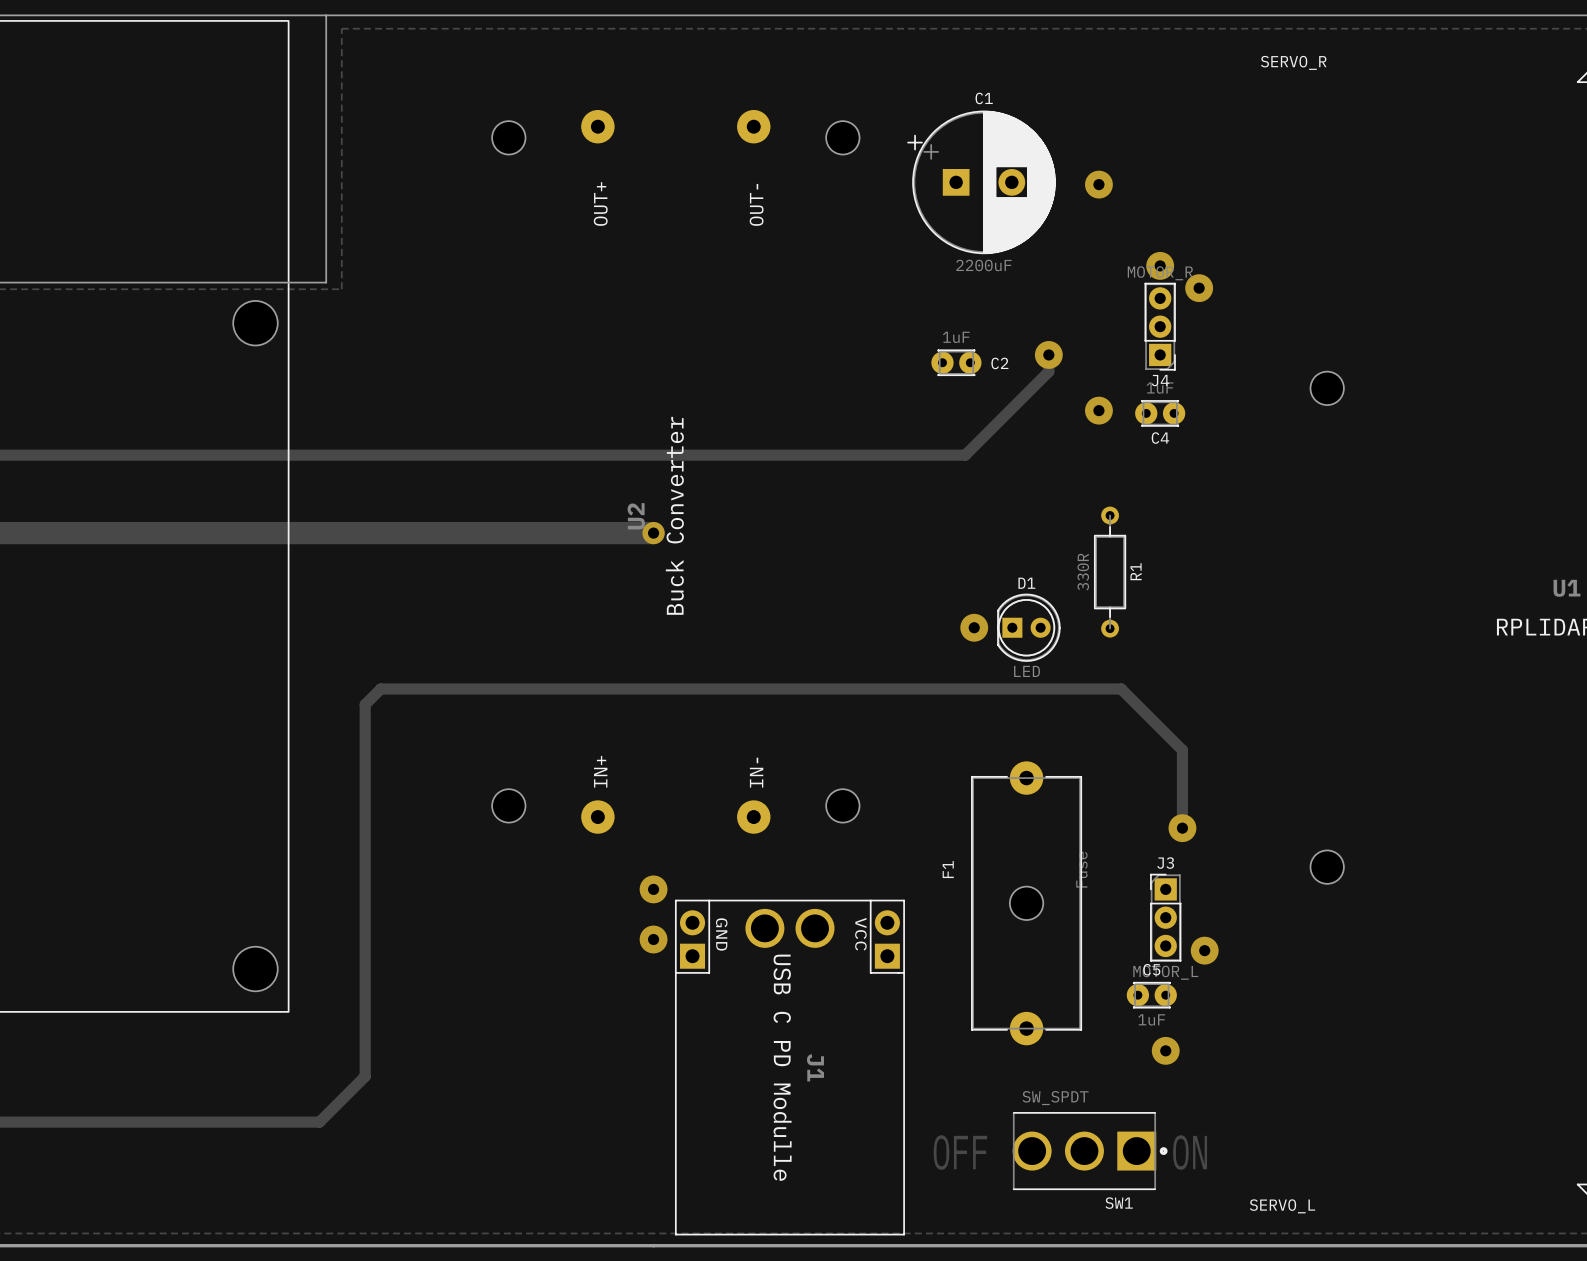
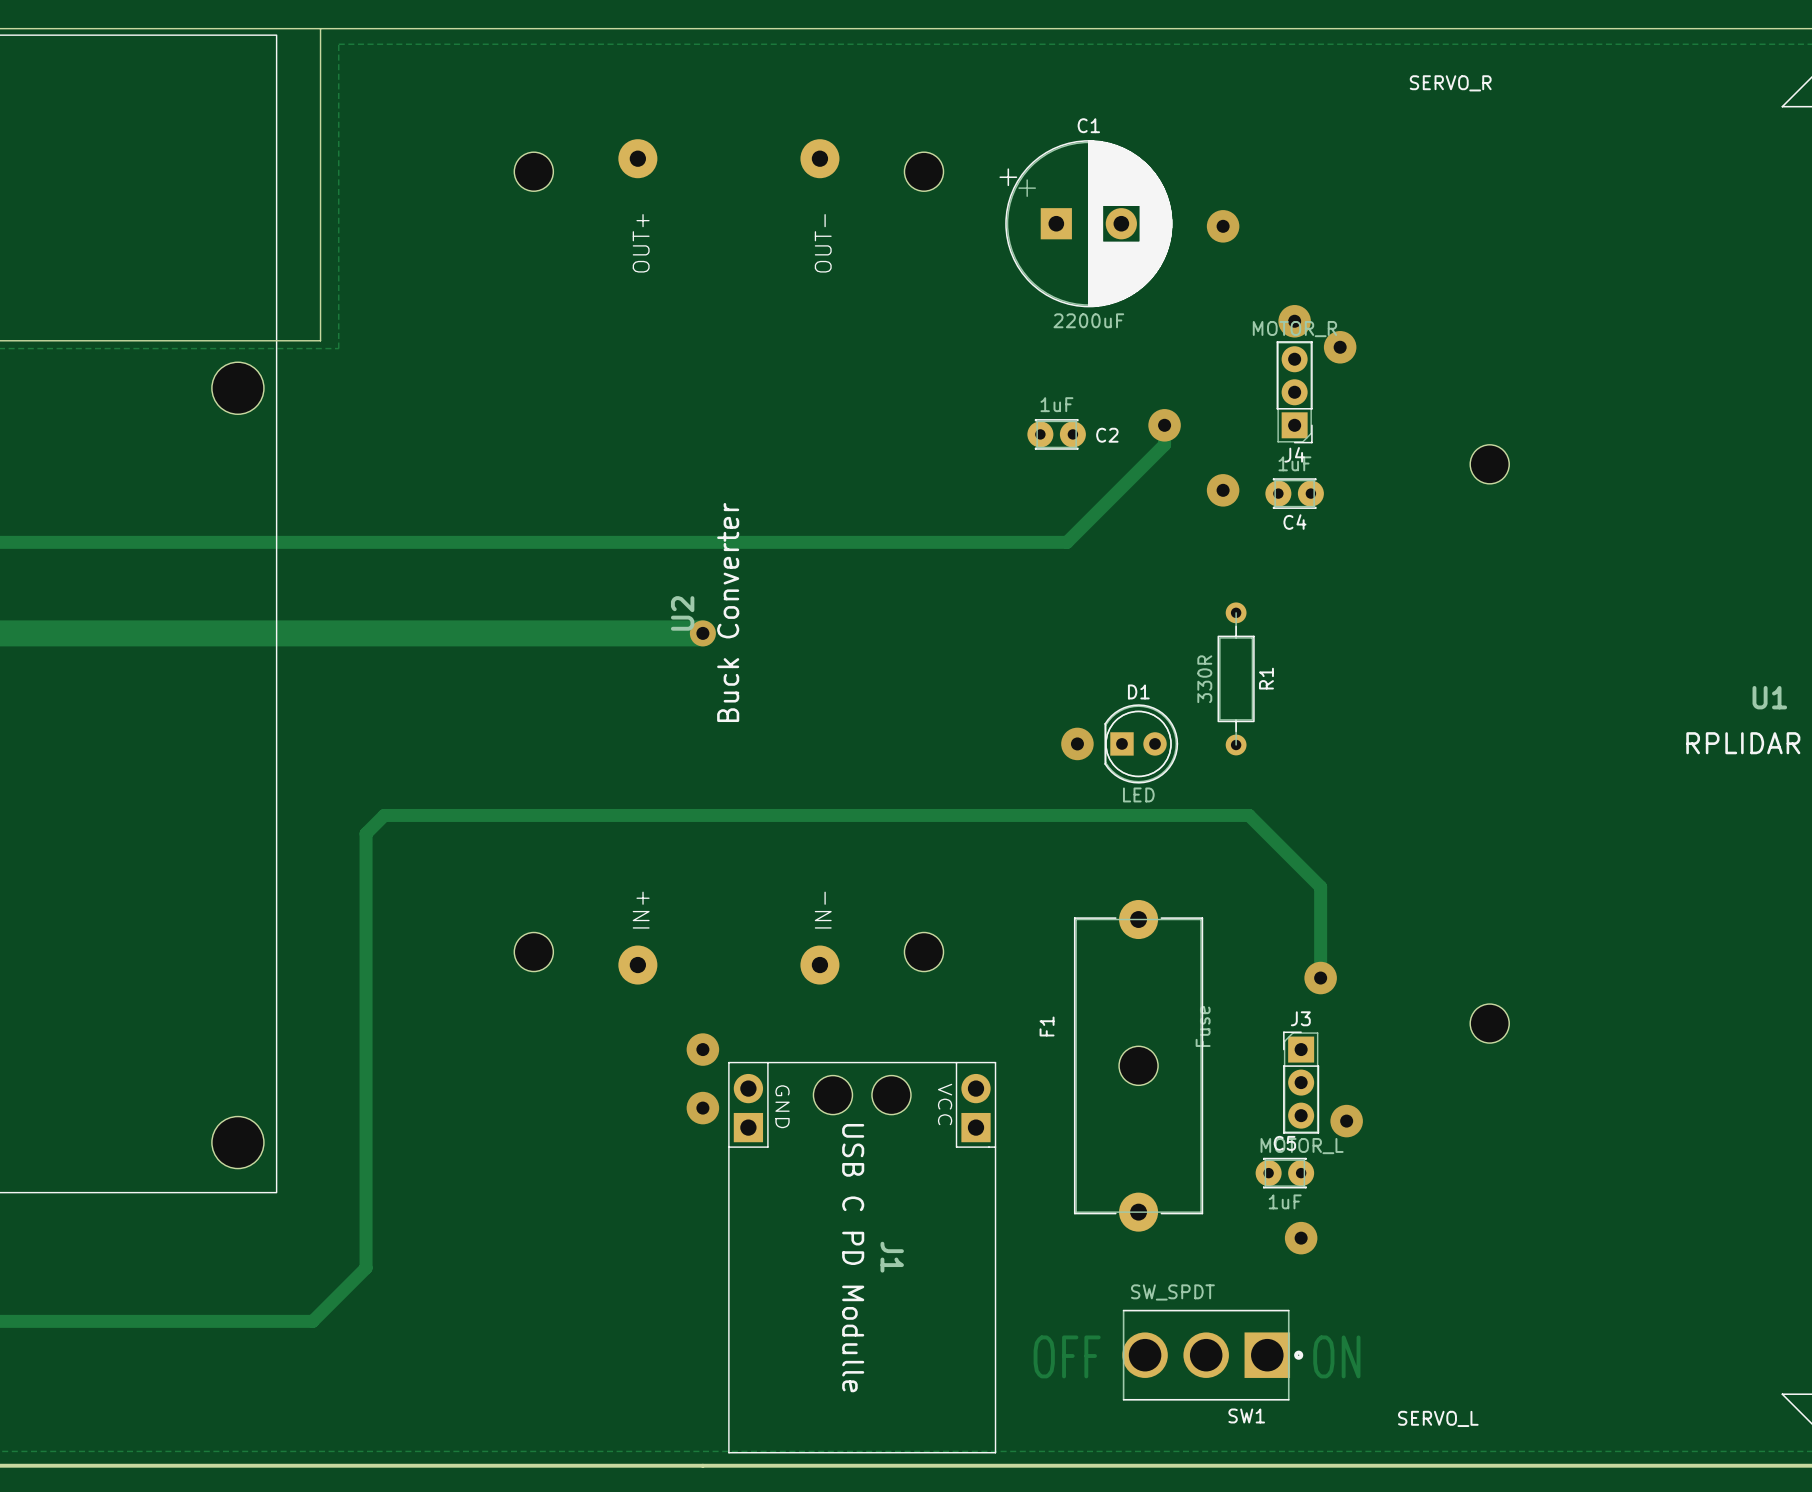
J1 footprint: [675, 899, 905, 1236] -> [728, 1061, 997, 1454]

